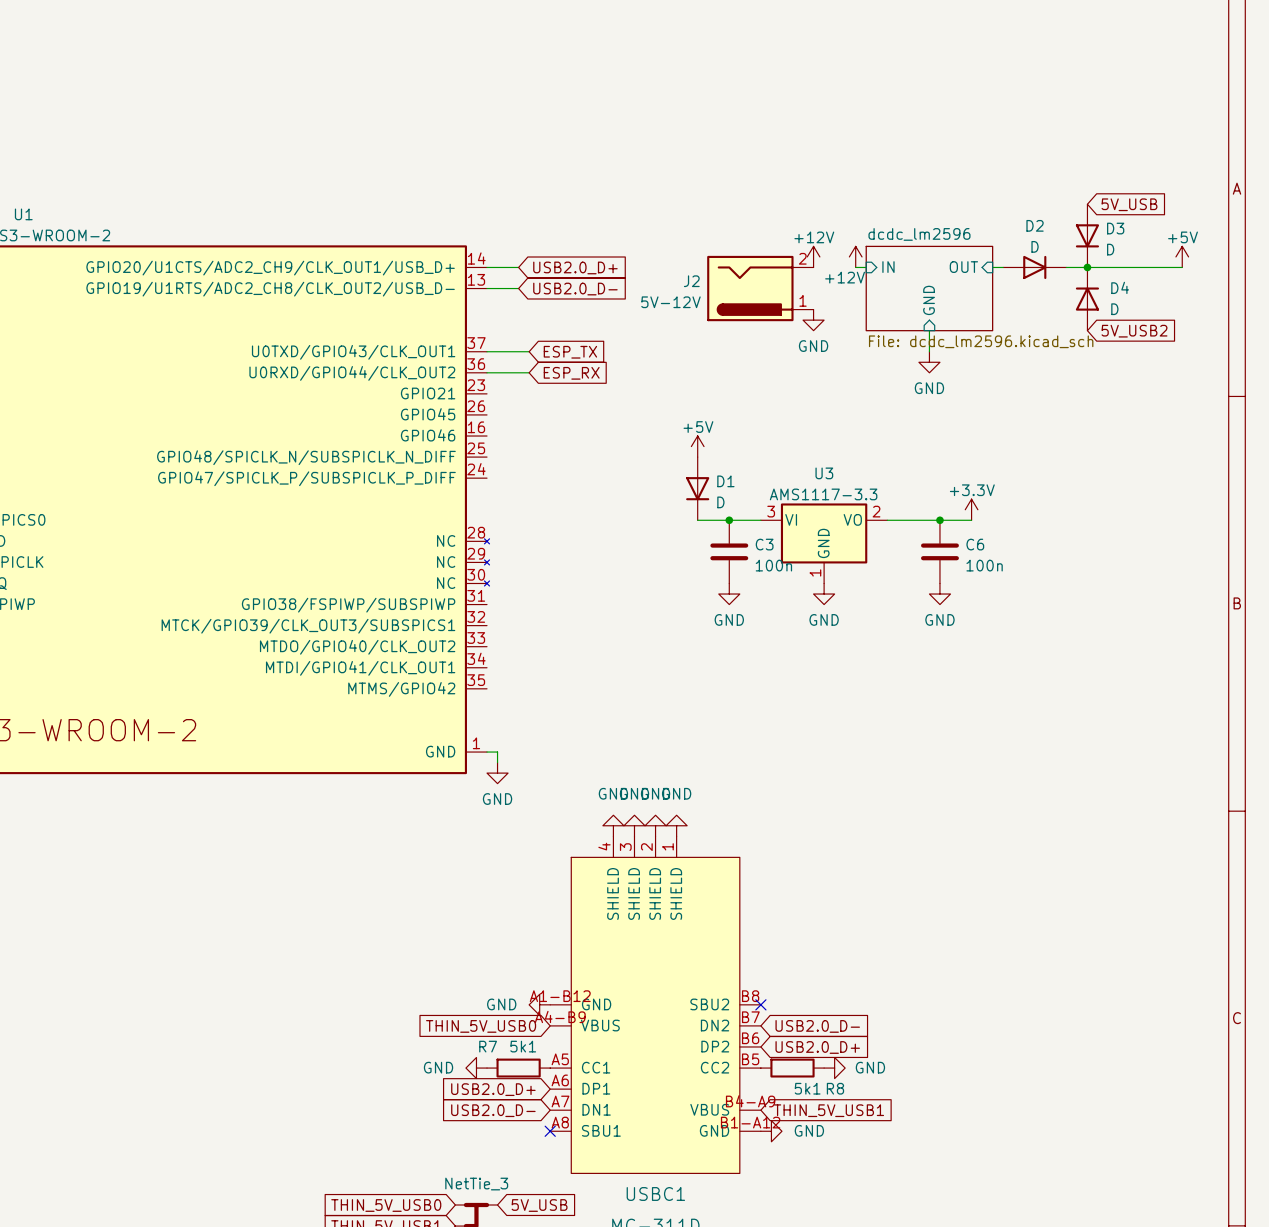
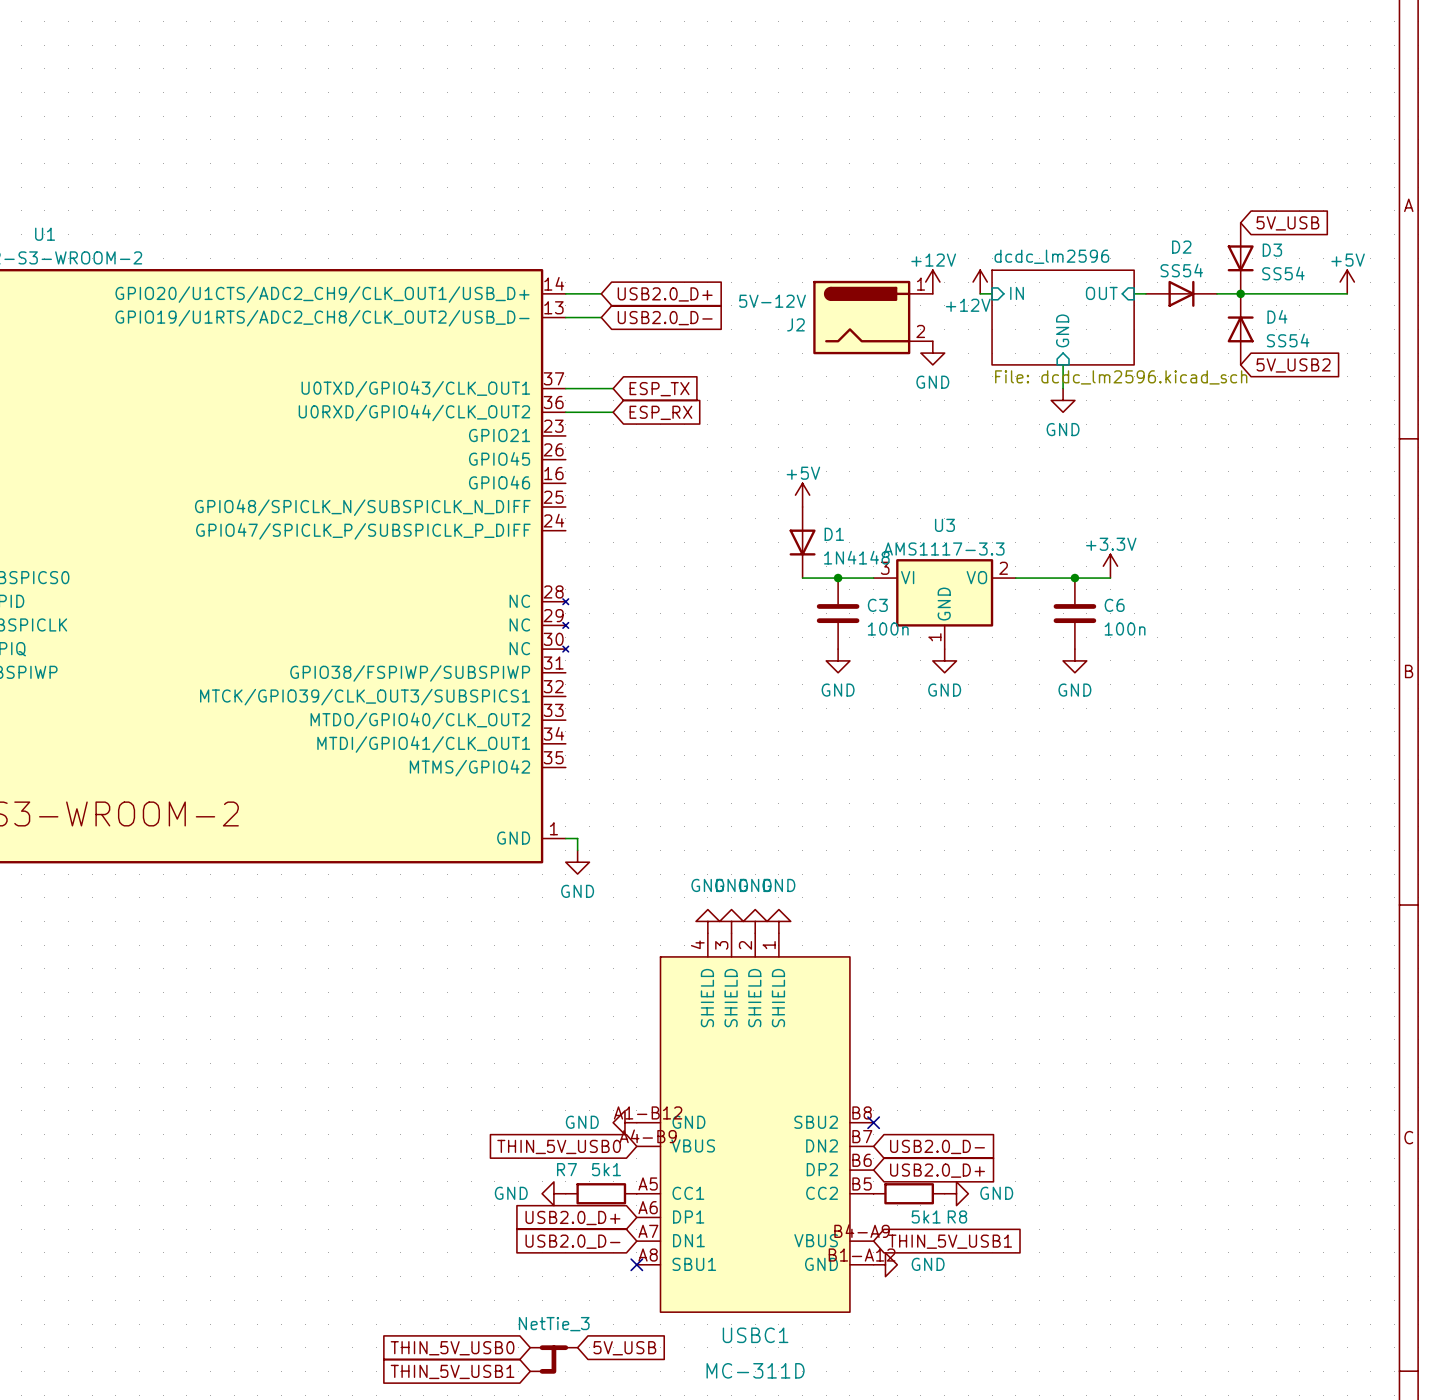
D2 value: D (1035, 246) -> SS54 (1181, 270)
D3 value: D (1110, 249) -> SS54 (1283, 273)
J2 flip: as is (750, 288) -> up-down (861, 317)
D4 value: D (1114, 309) -> SS54 (1288, 340)
D1 value: D (720, 502) -> 1N4148 (856, 557)

